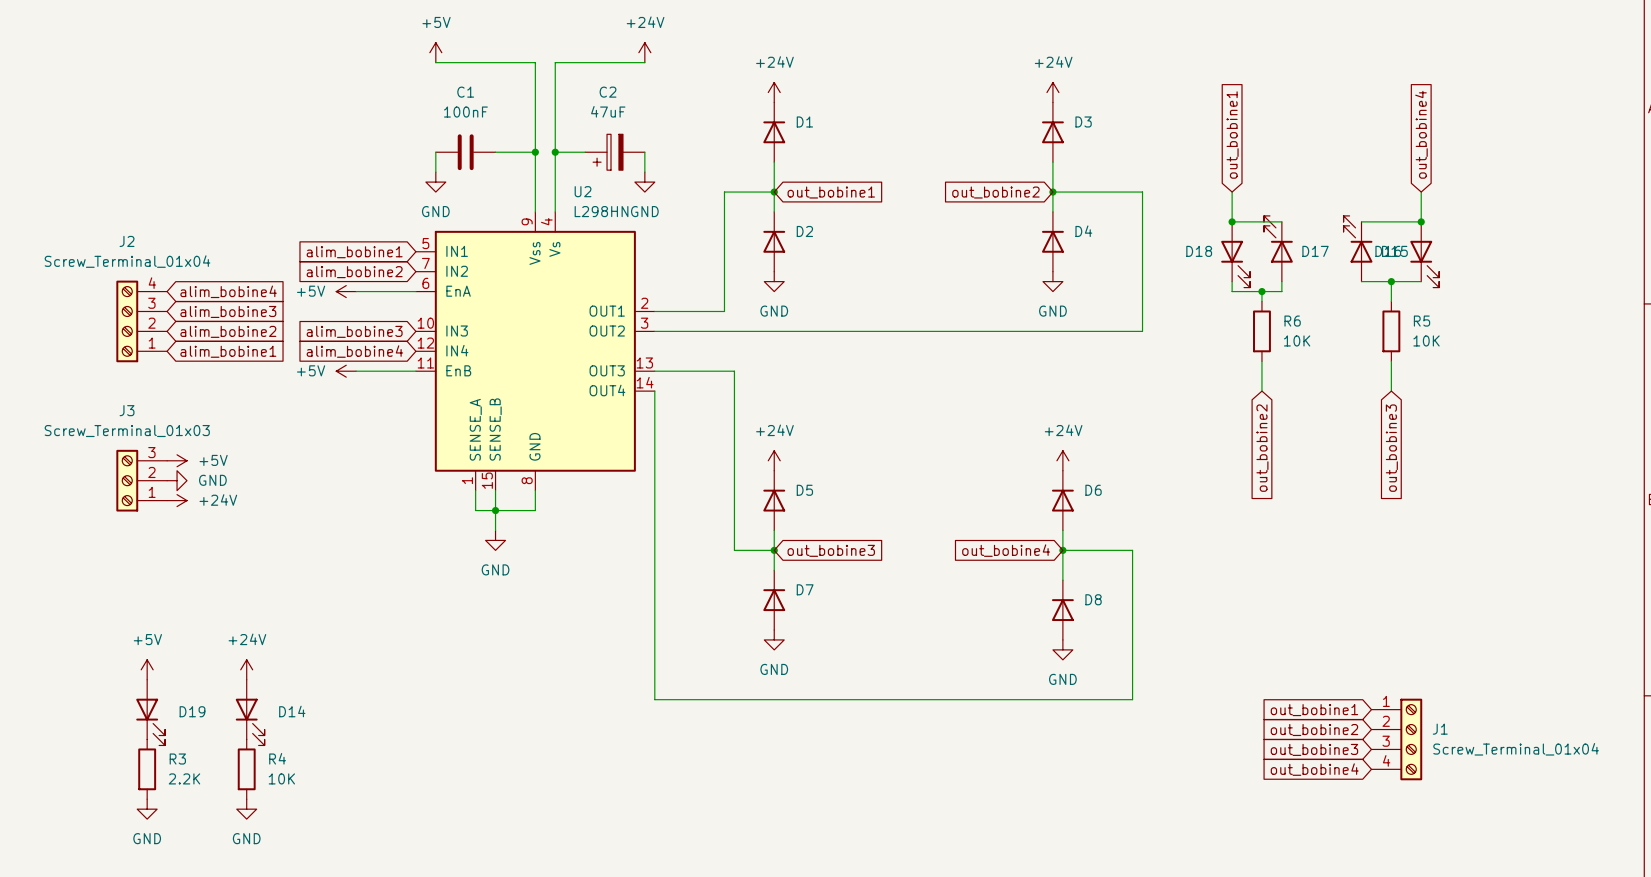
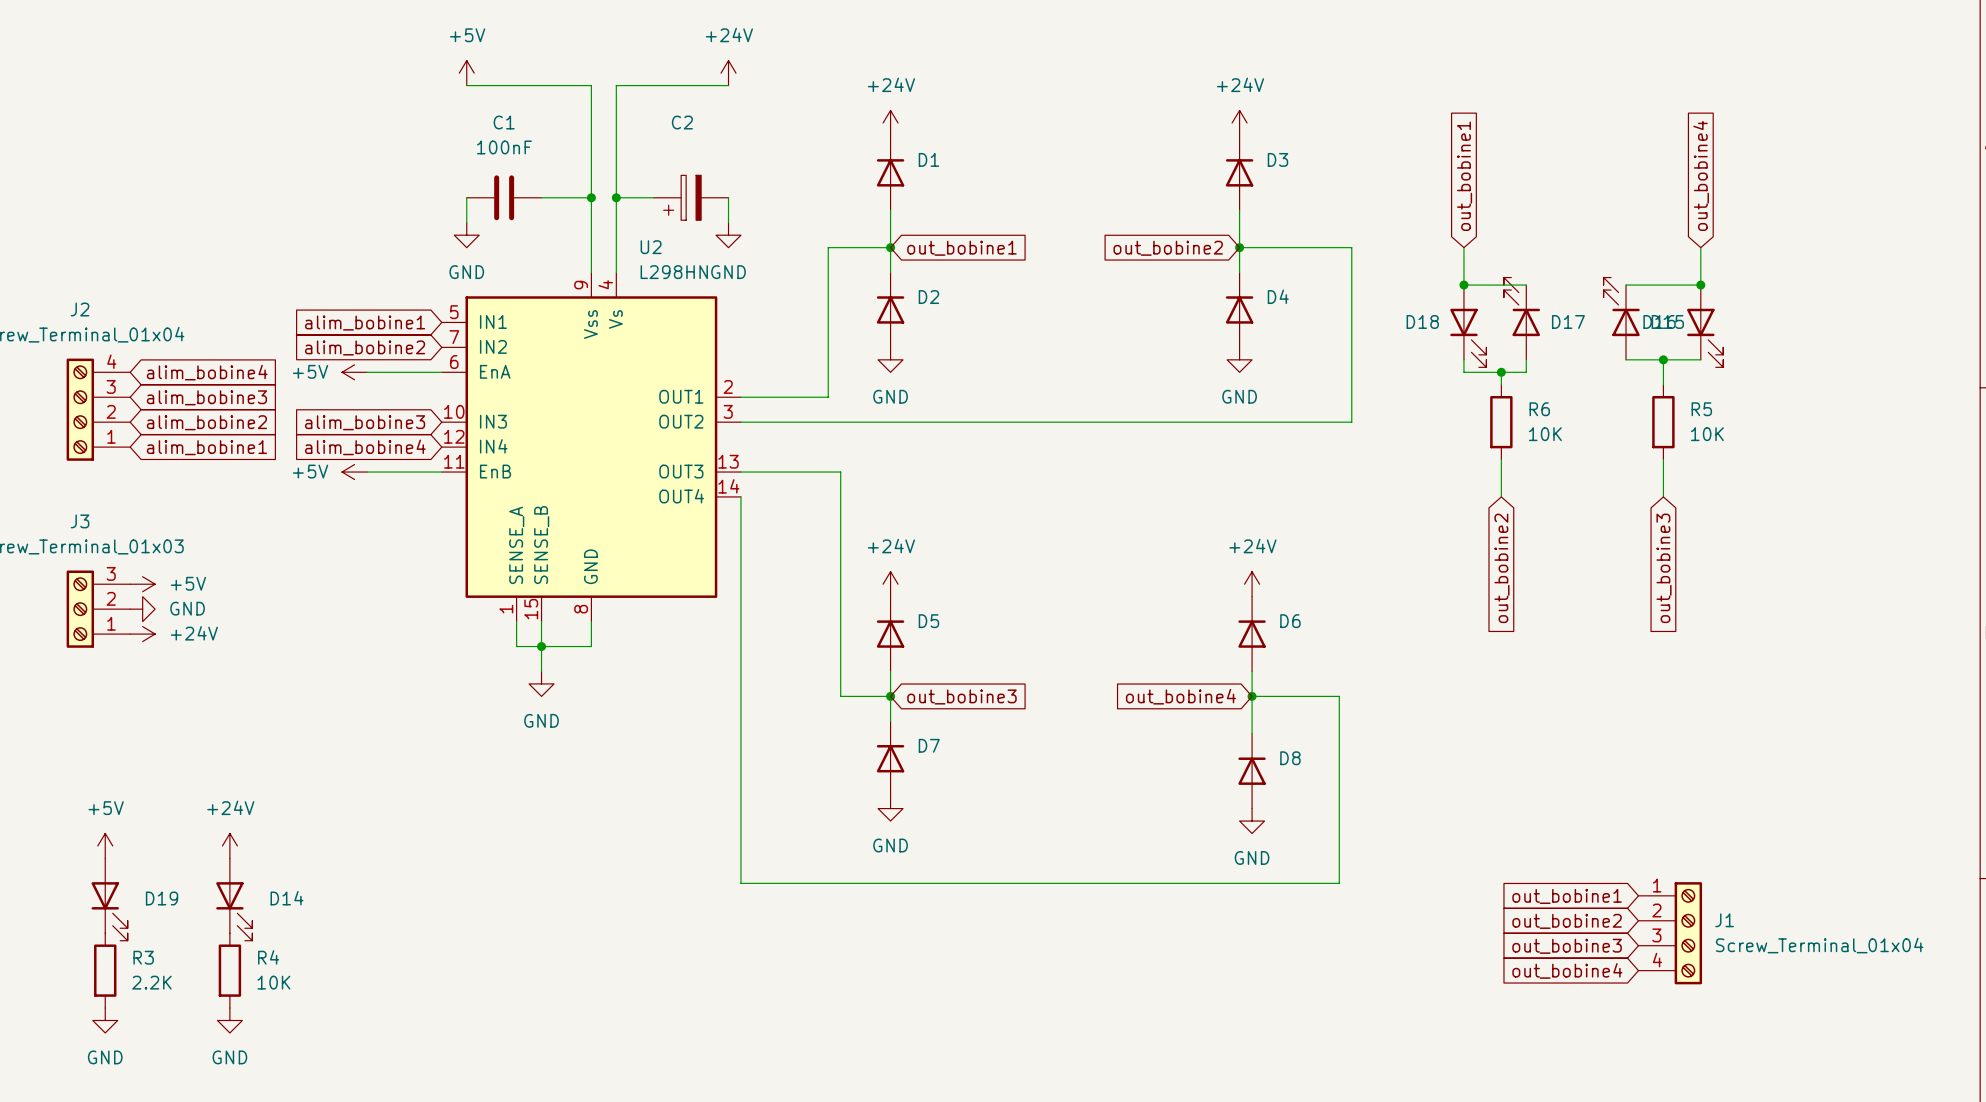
C2 value: 47uF (608, 111) -> none

